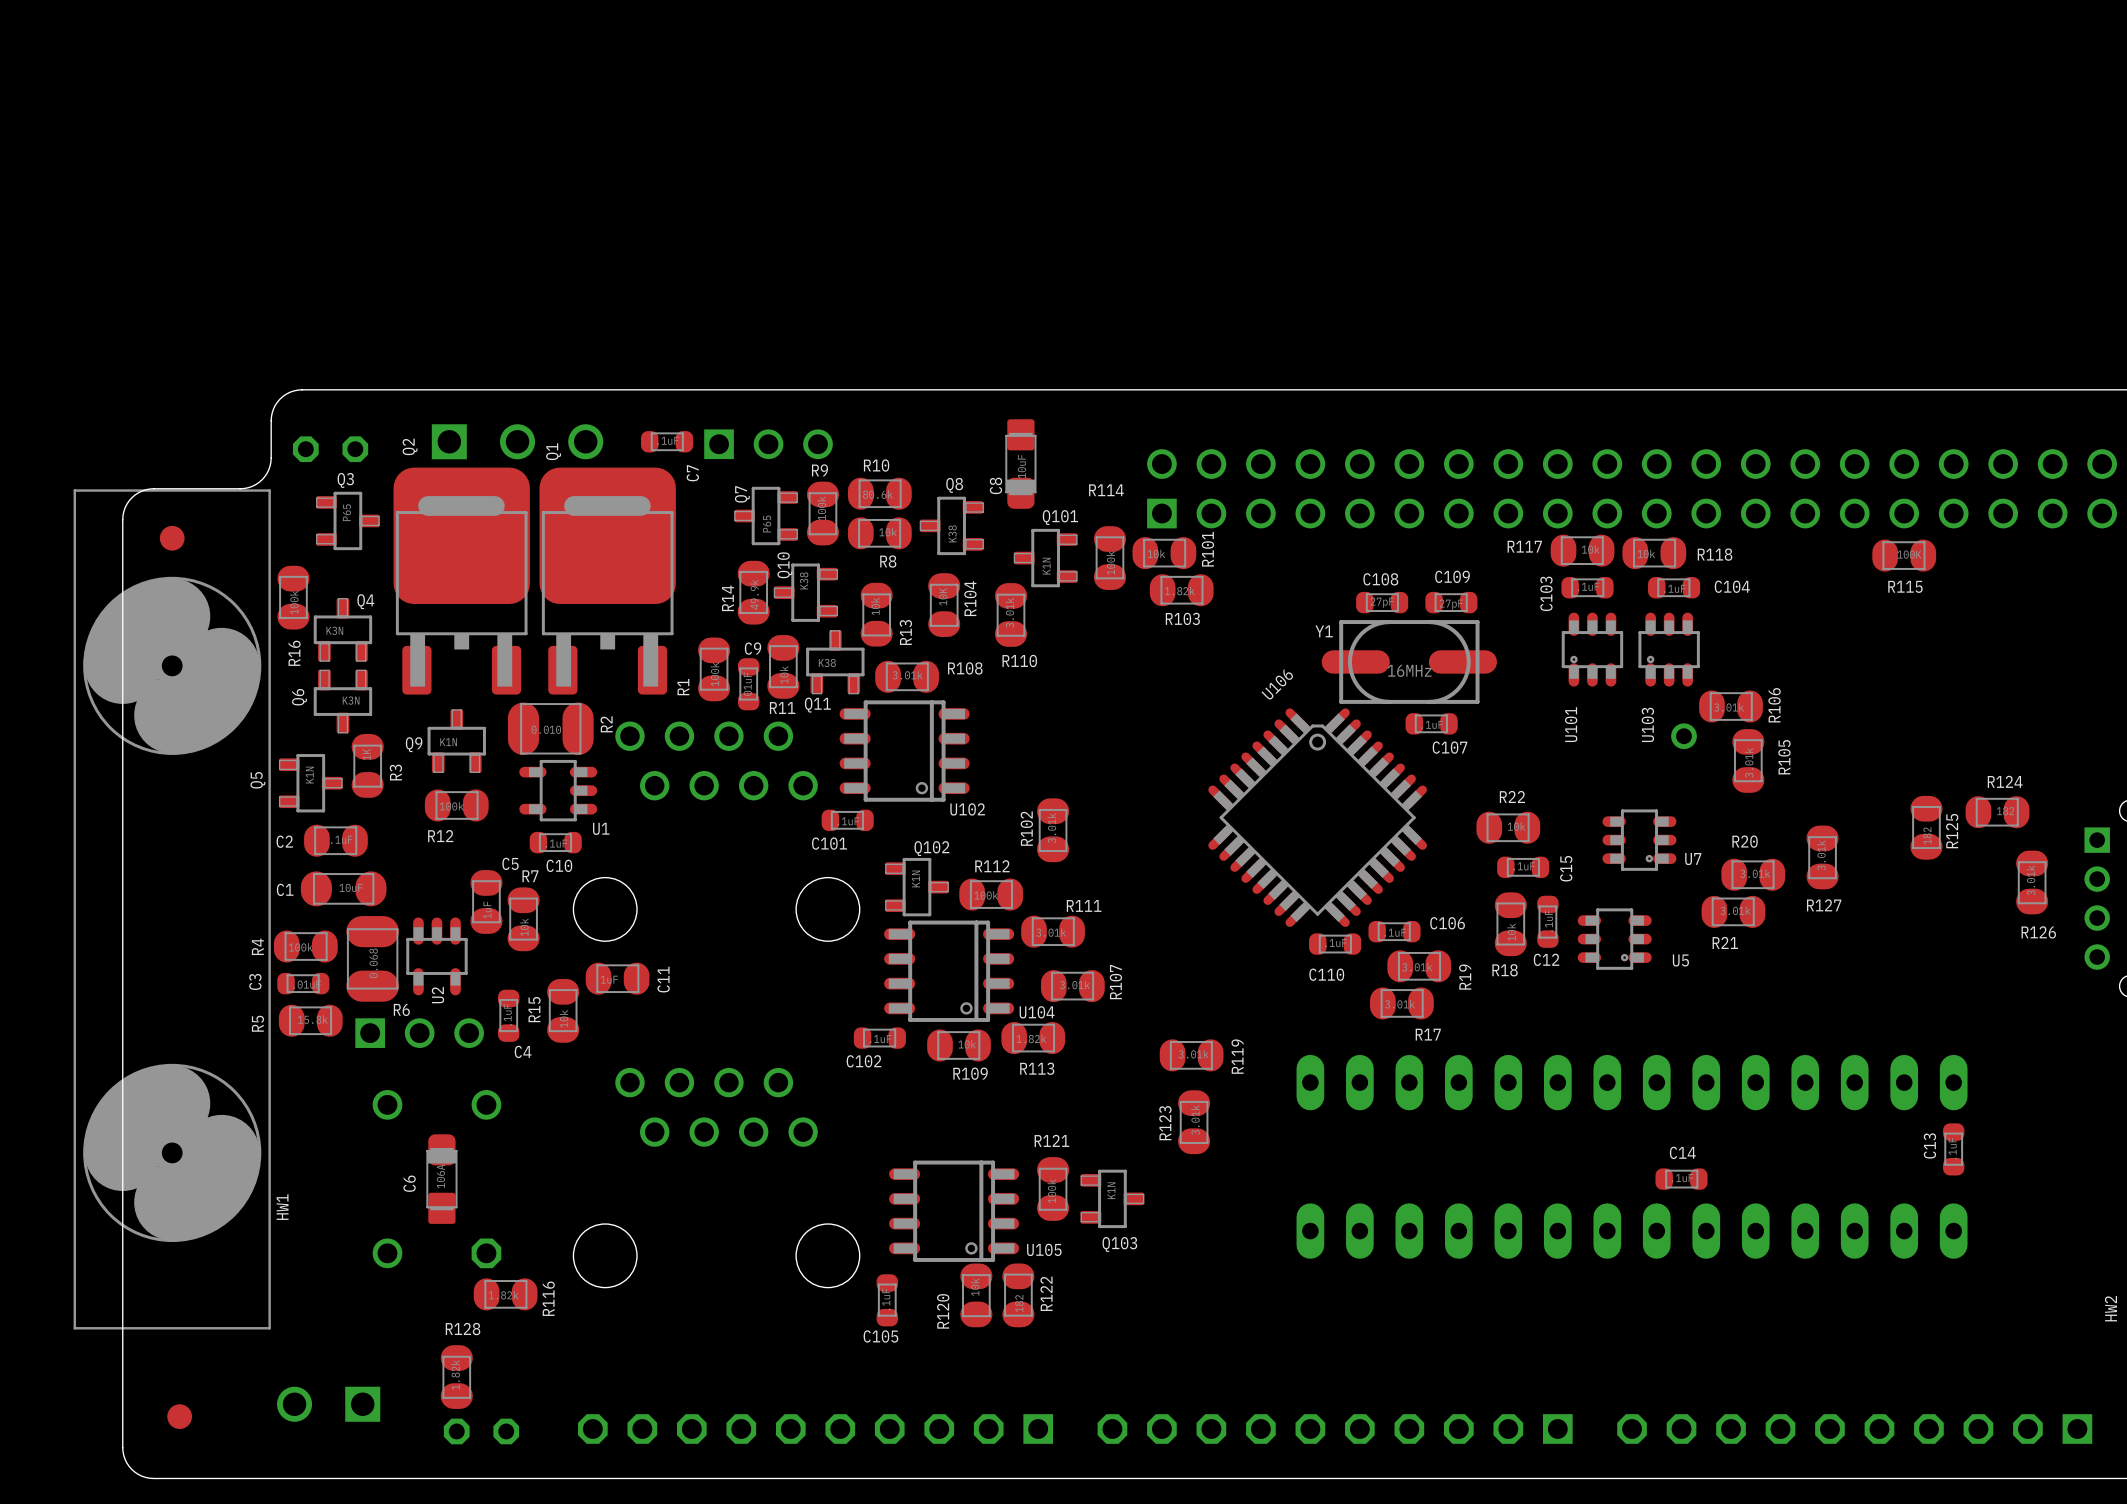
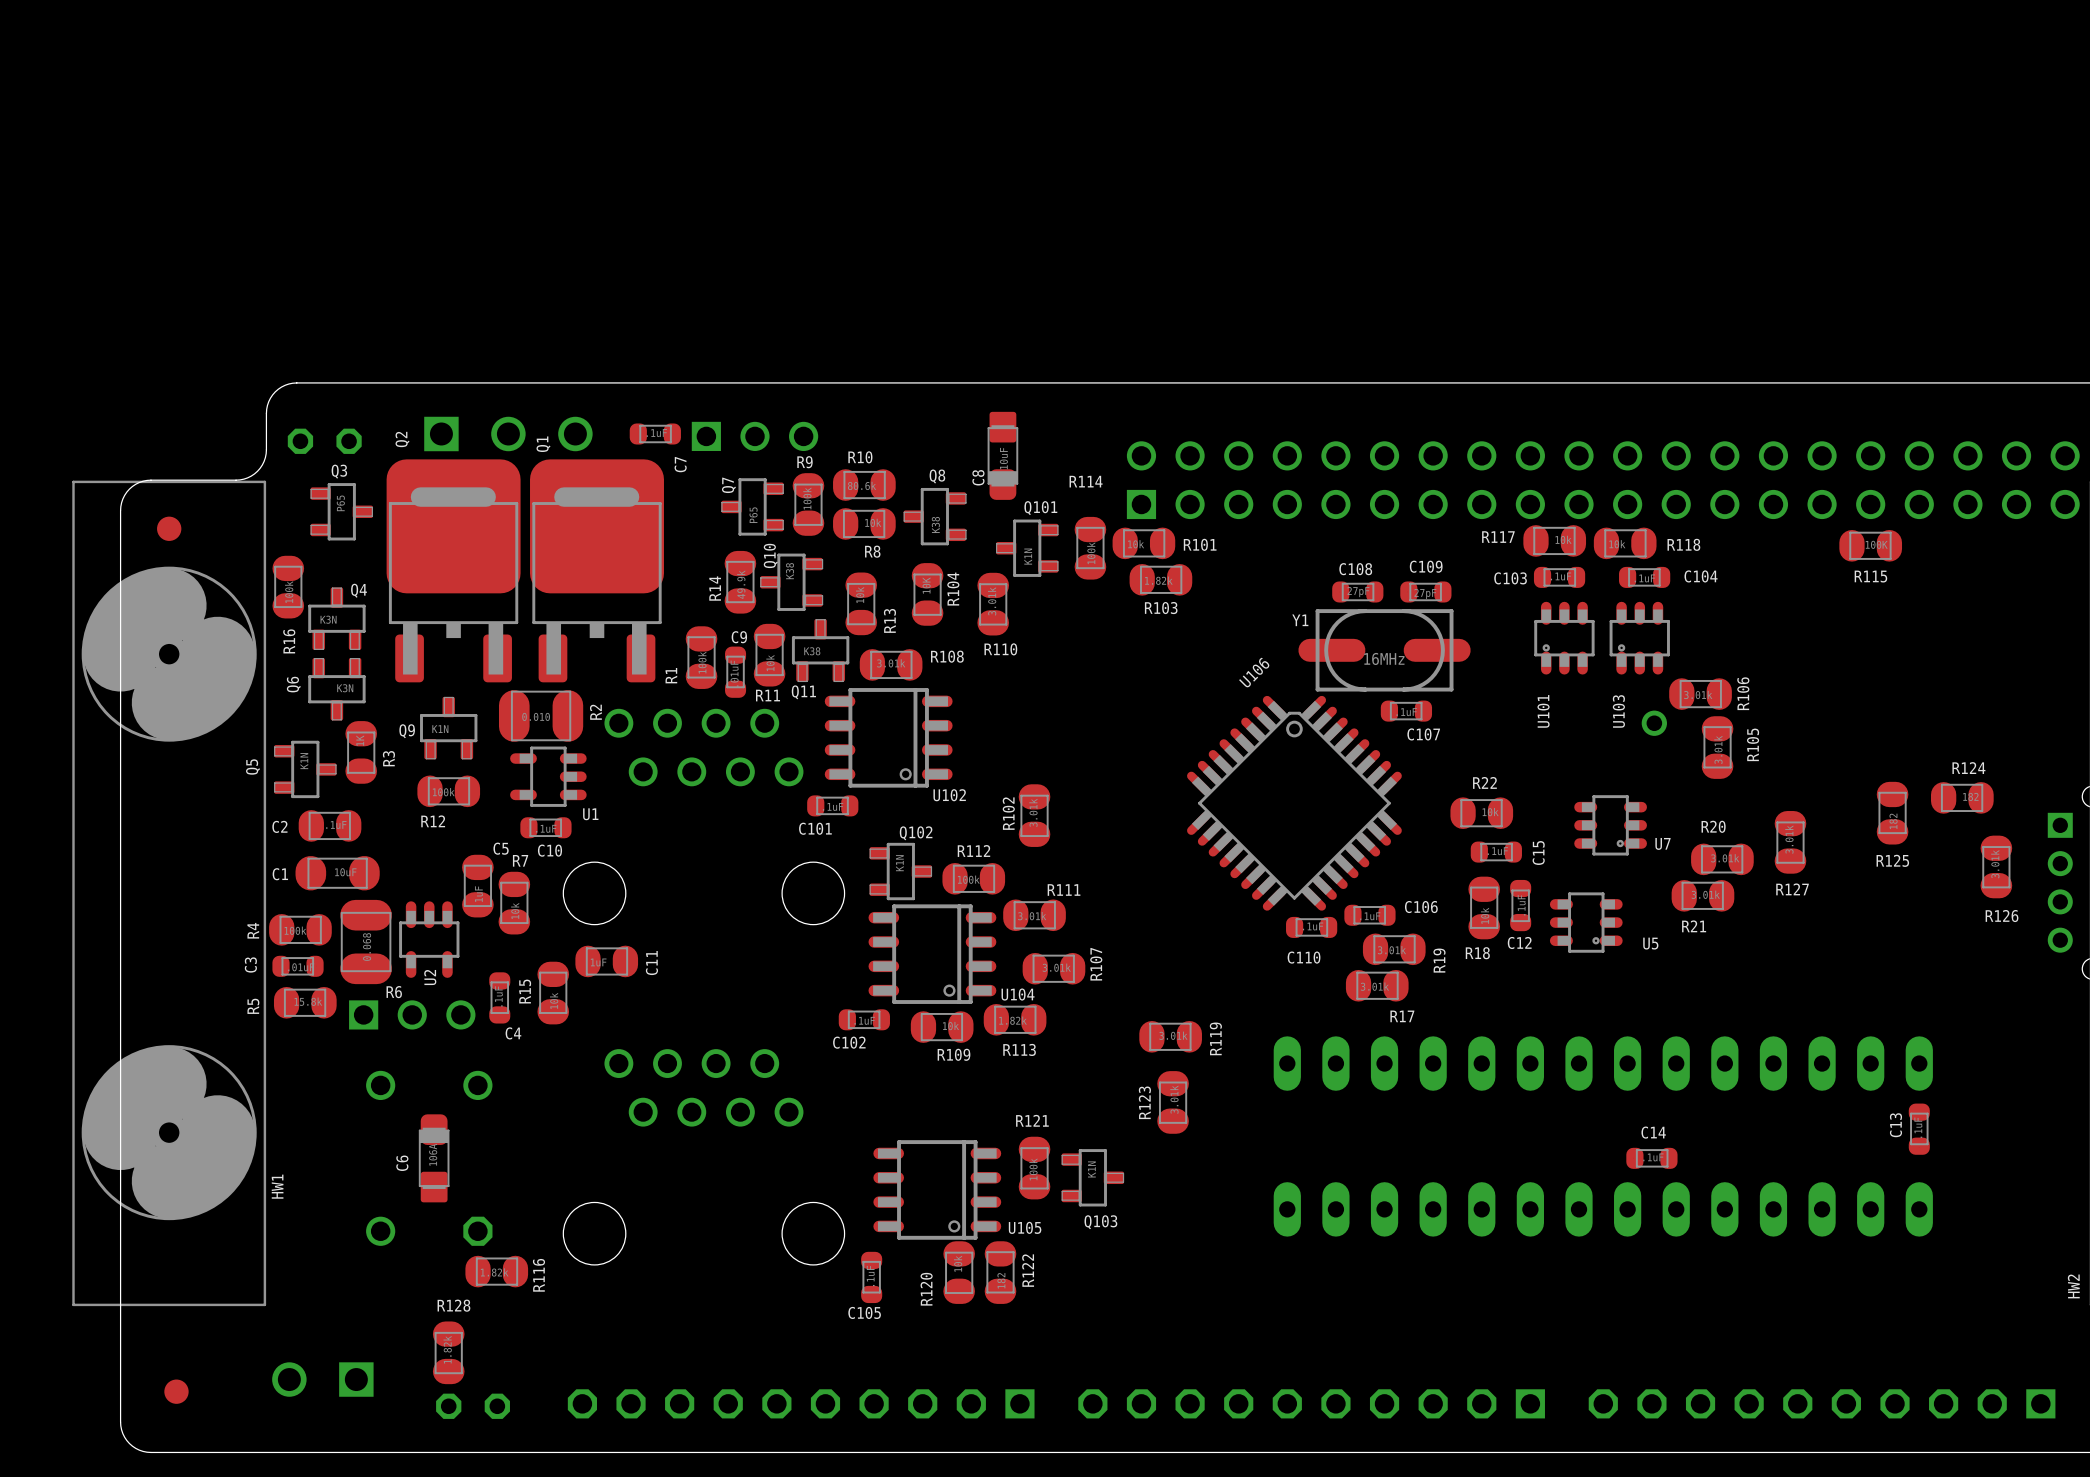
R101 name rotation: 0° (1207, 549) -> 90° clockwise (1200, 544)
C103 name rotation: 0° (1546, 593) -> 90° clockwise (1510, 578)
R125 name rotation: 0° (1952, 831) -> 90° clockwise (1892, 860)

